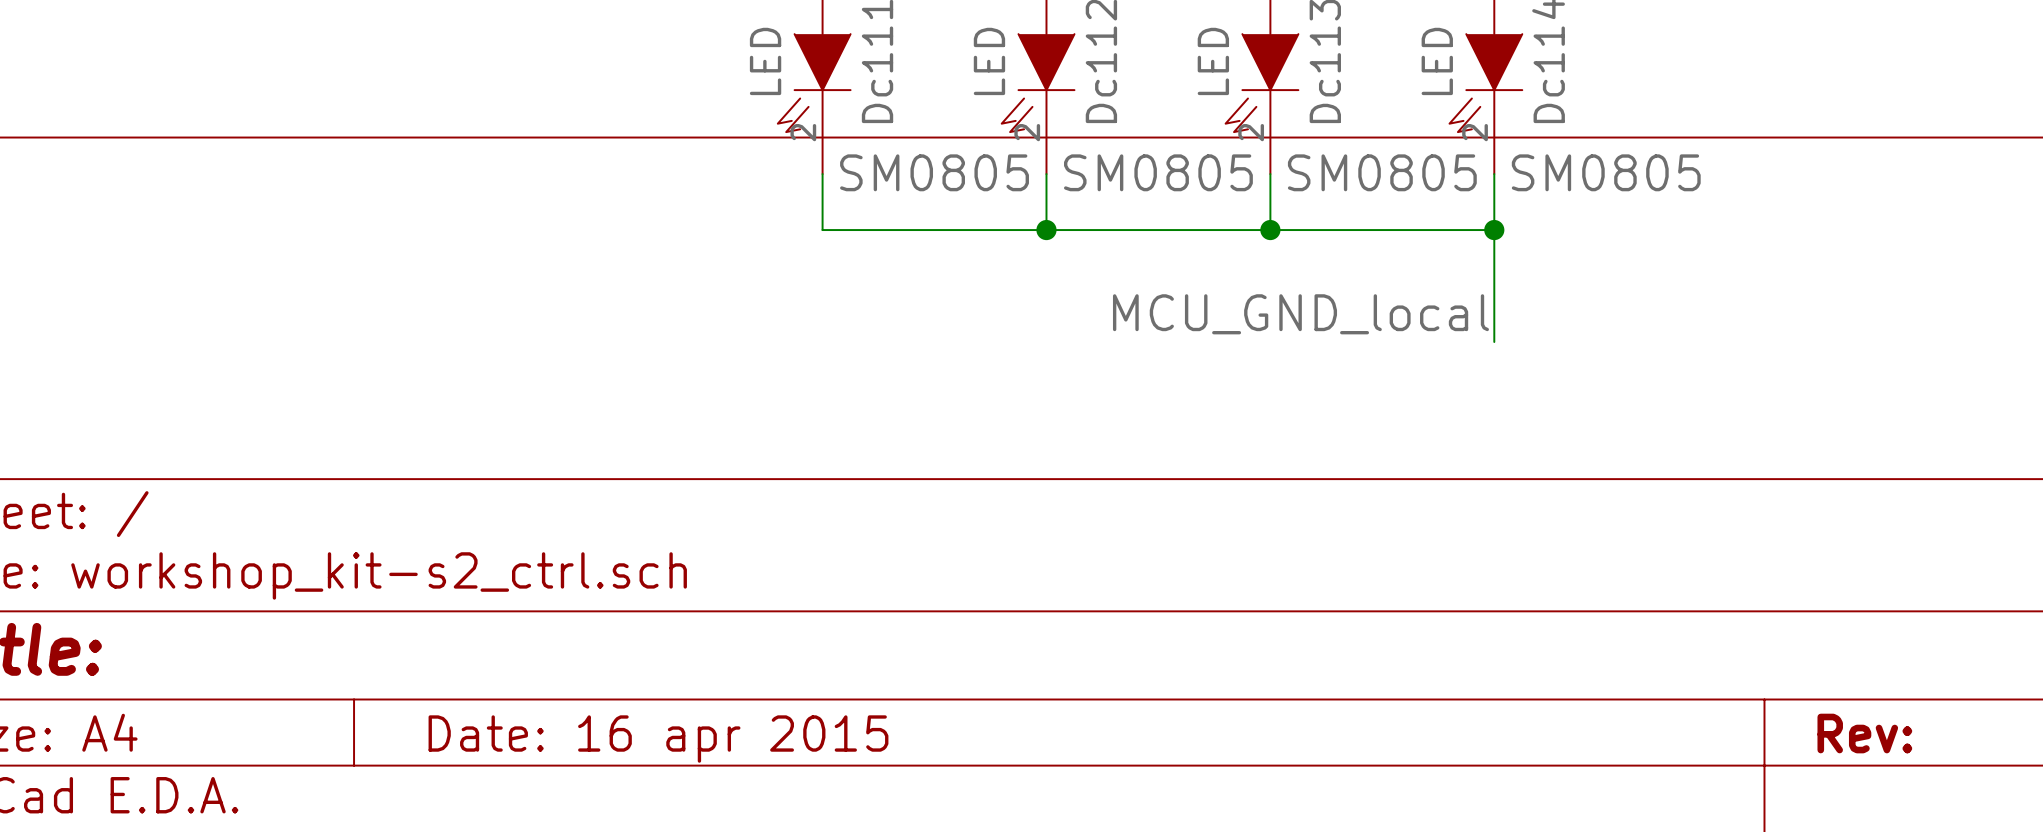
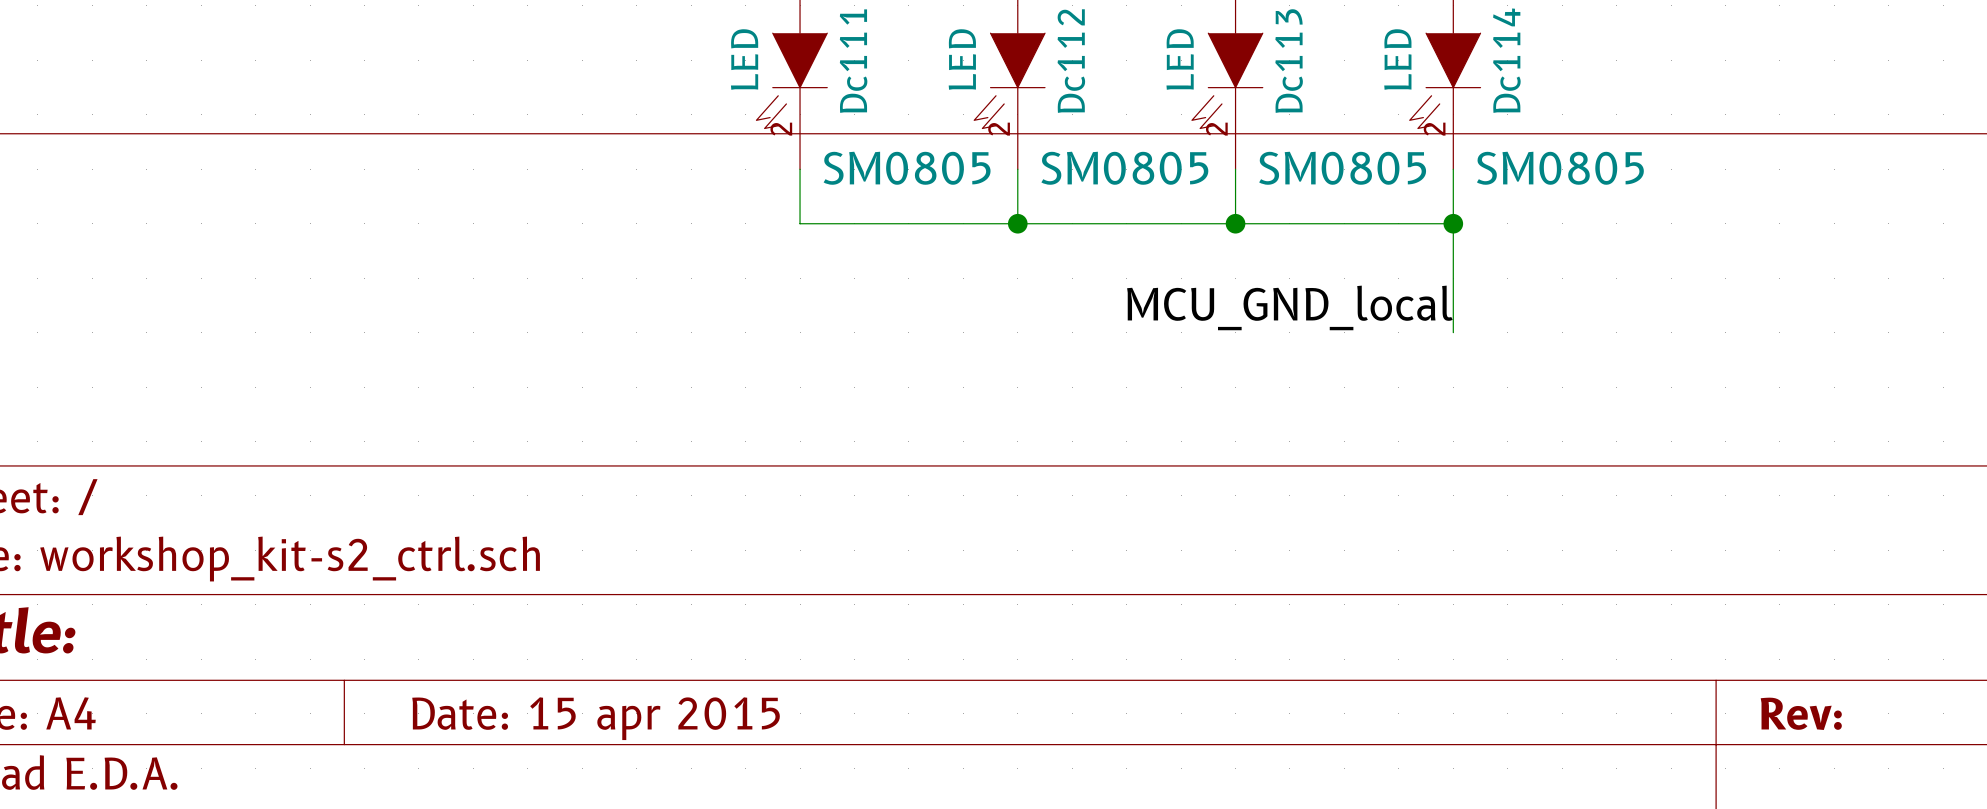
title block: Date: 16 apr 2015 (658, 739) -> Date: 15 apr 2015 (596, 718)

